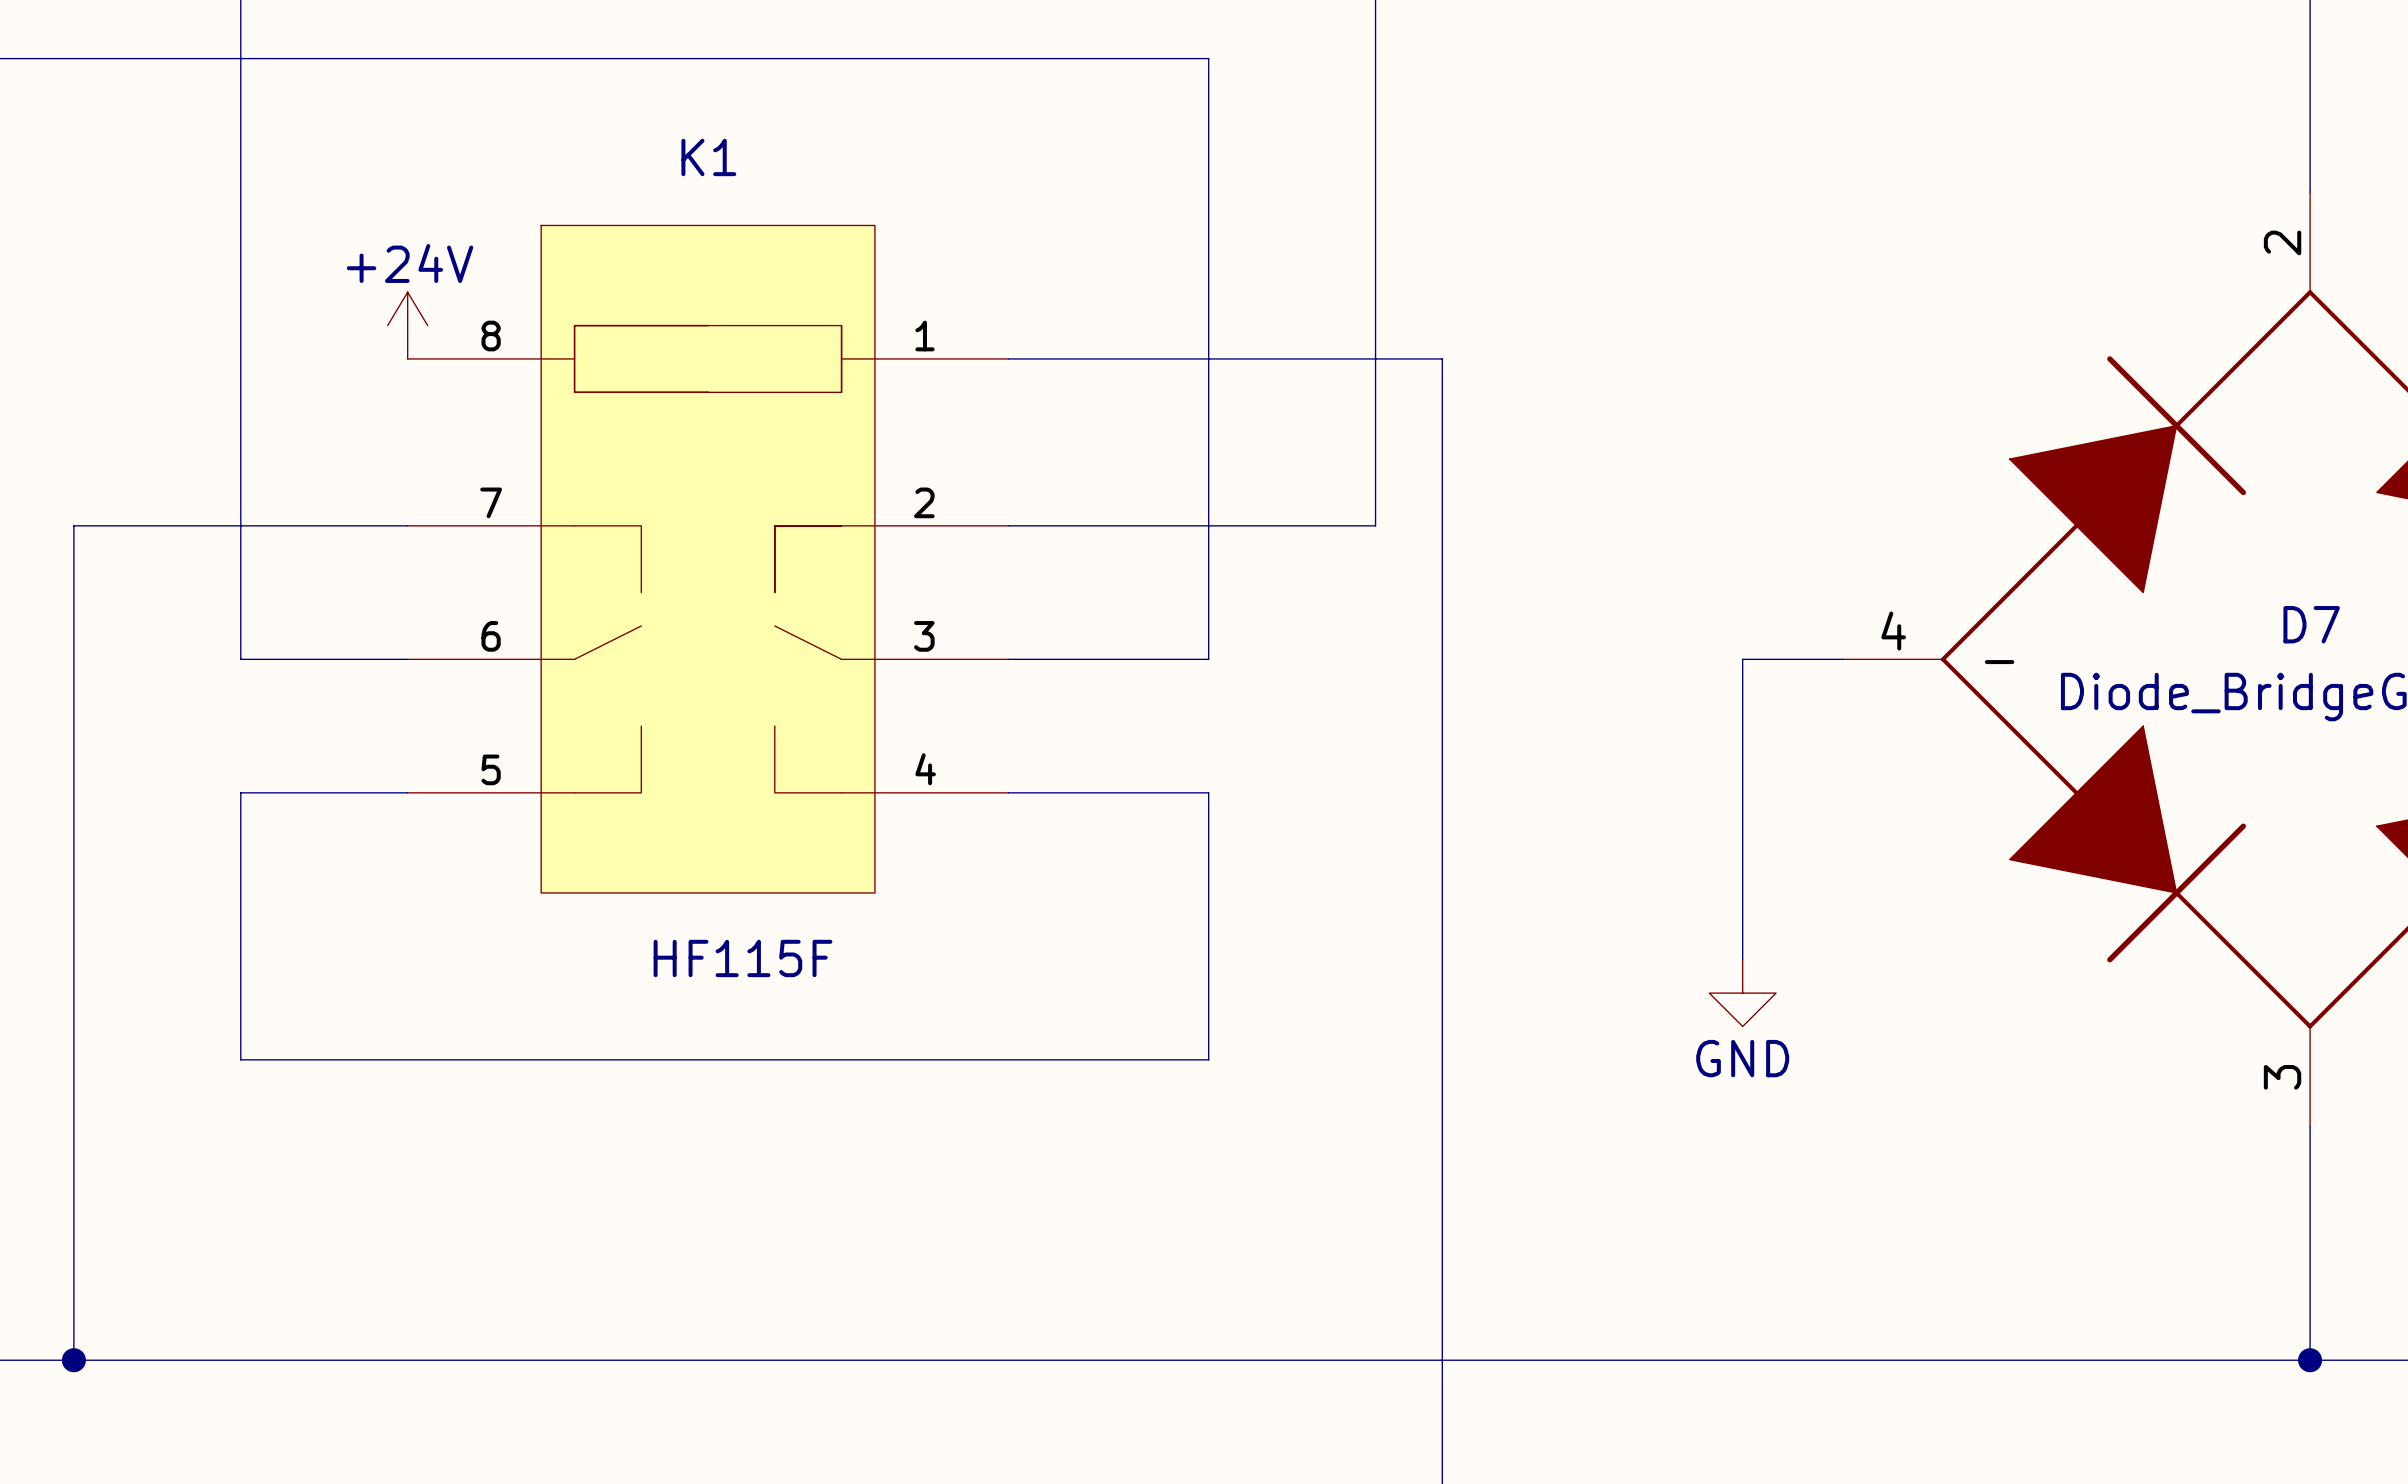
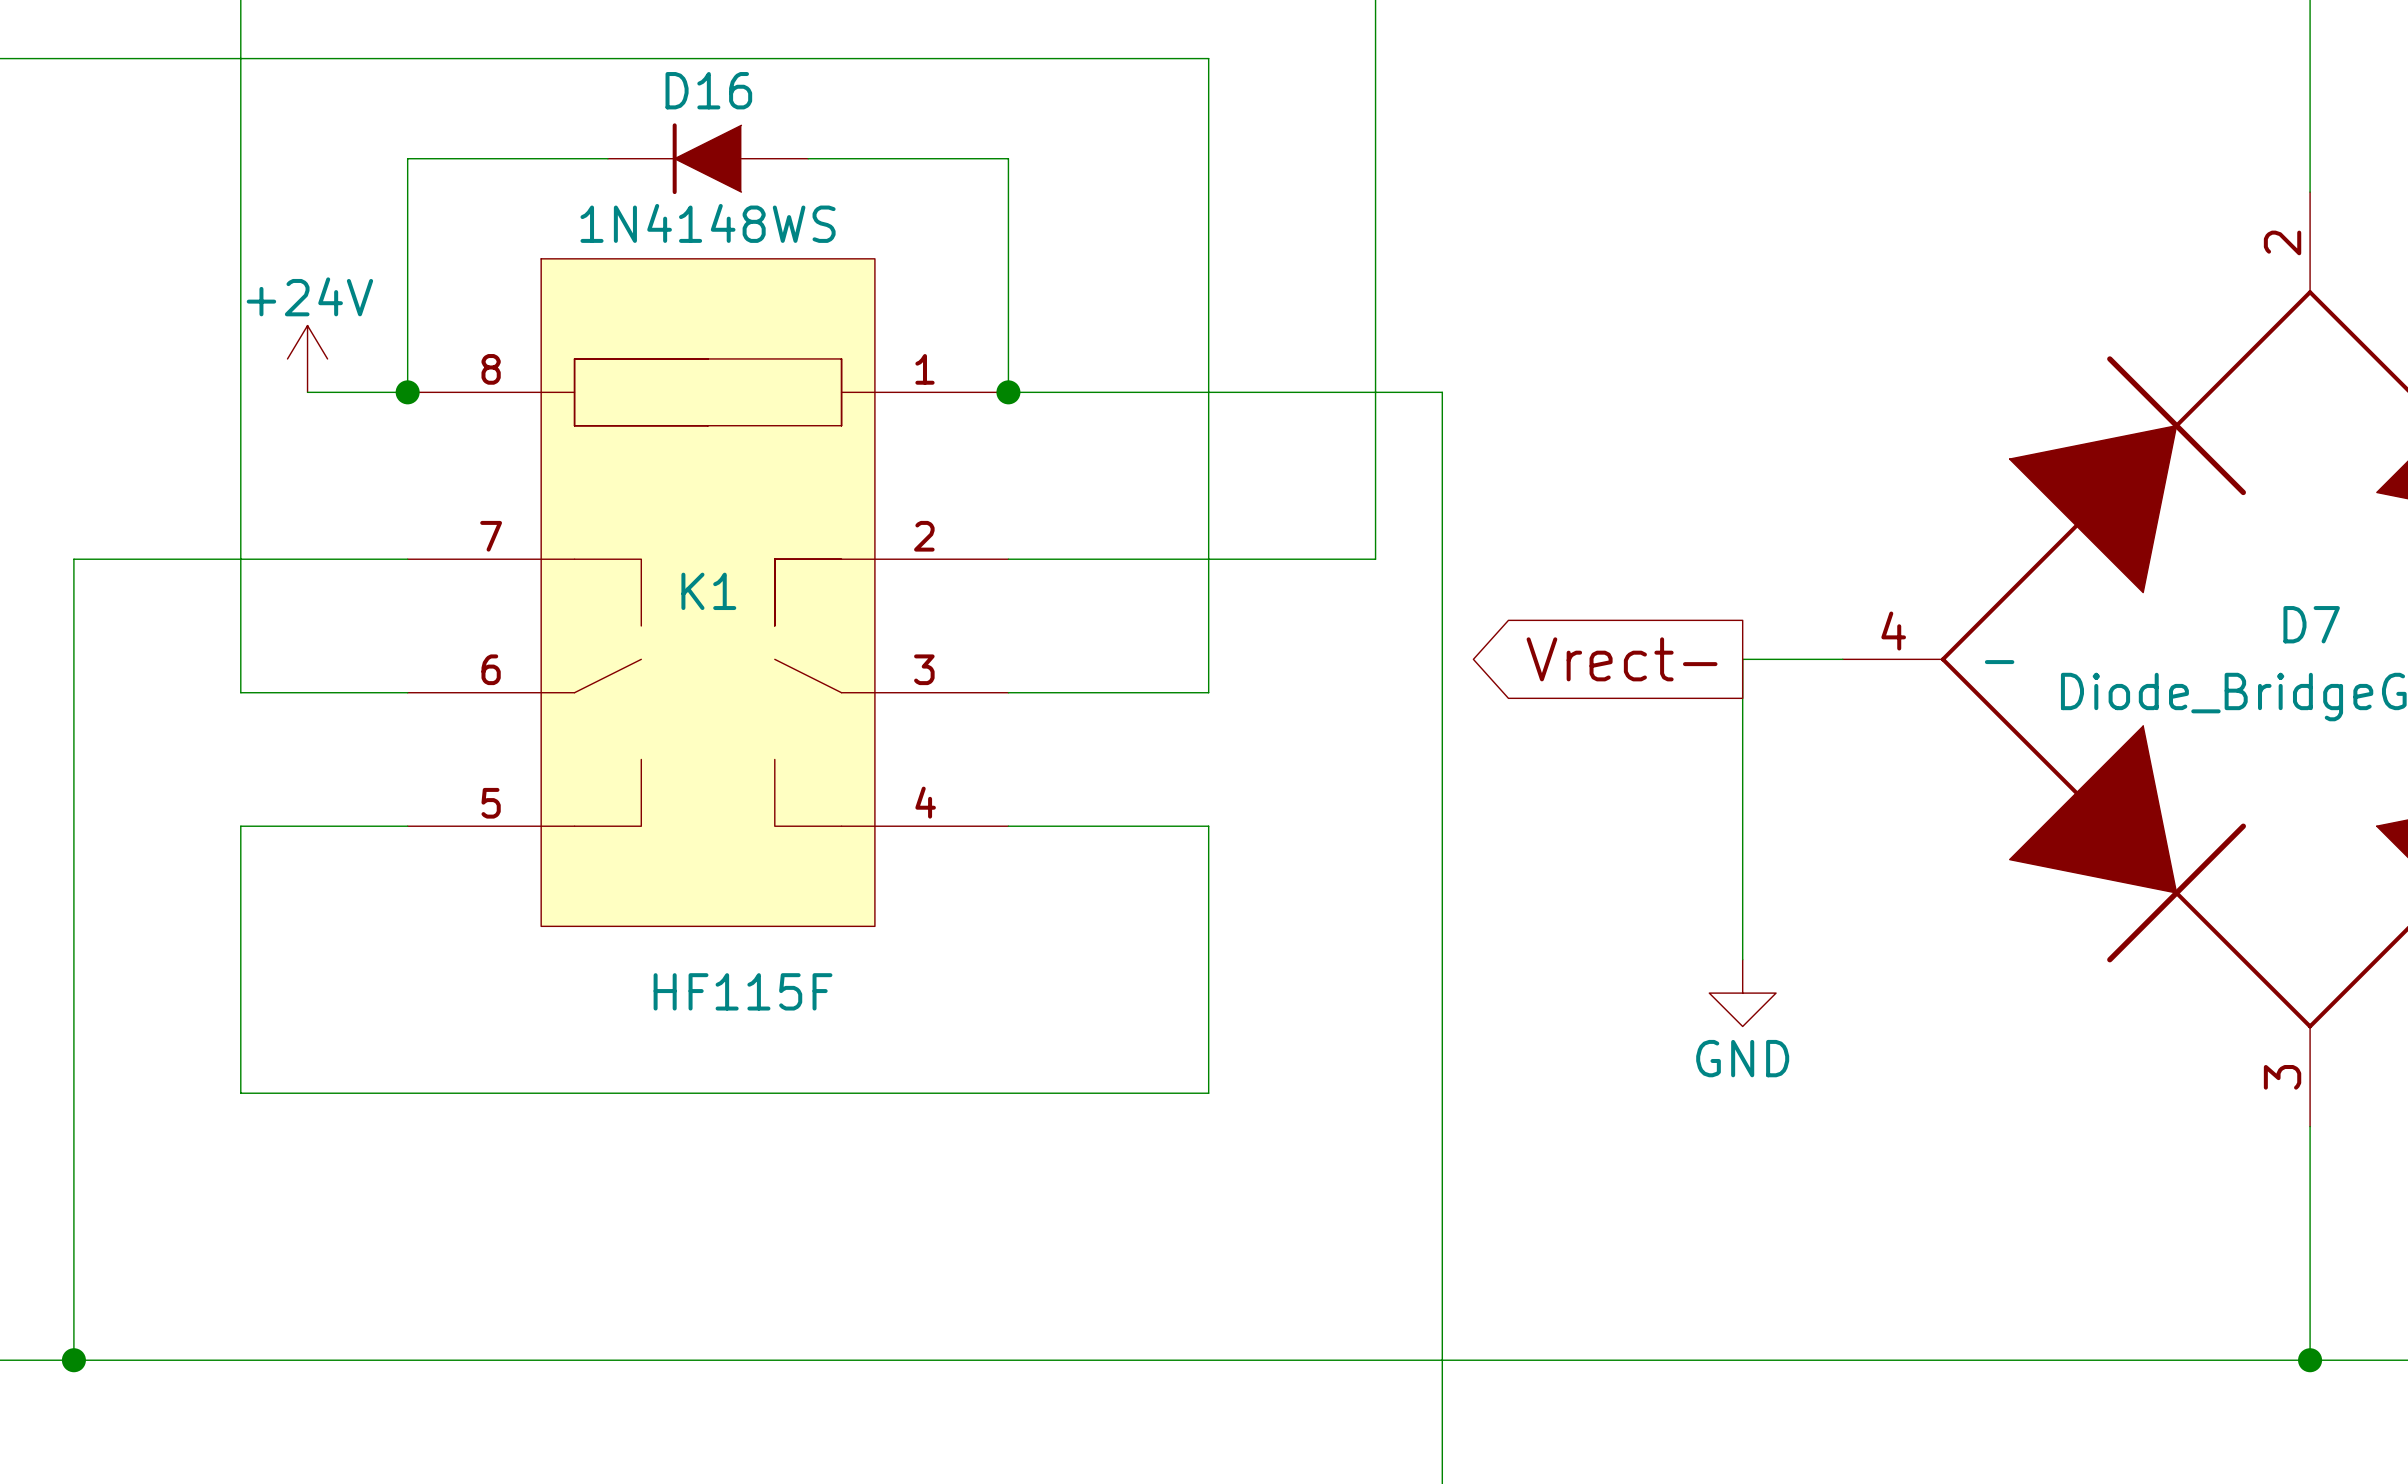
K1 name position: K1 (708, 157) -> K1 (708, 591)
wire: none -> (607, 158) (407, 158) (407, 392) (307, 392)
D16: none -> 1N4148WS (708, 158)
power symbol position: +24V (407, 325) -> +24V (307, 358)
wire: (1008, 358) (1442, 358) (1442, 392) -> (808, 158) (1008, 158) (1008, 392) (1442, 392)
junction: none -> (407, 392)
junction: none -> (1008, 392)
wire: (407, 525) (73, 525) (73, 559) -> (407, 559) (73, 559)
wire: (1008, 525) (1375, 525) -> (1008, 559) (1375, 559) (1375, 525)
K1 position: (708, 559) -> (708, 592)
wire: (240, 659) (407, 659) -> (240, 659) (240, 692) (407, 692)
wire: (1008, 659) (1208, 659) -> (1008, 692) (1208, 692) (1208, 659)
global label: none -> Vrect- (1622, 659)
wire: (407, 792) (240, 792) (240, 826) -> (407, 826) (240, 826)
wire: (1008, 792) (1208, 792) (1208, 826) -> (1008, 826) (1208, 826)
wire: (240, 1059) (1208, 1059) -> (240, 1059) (240, 1093) (1208, 1093) (1208, 1059)

